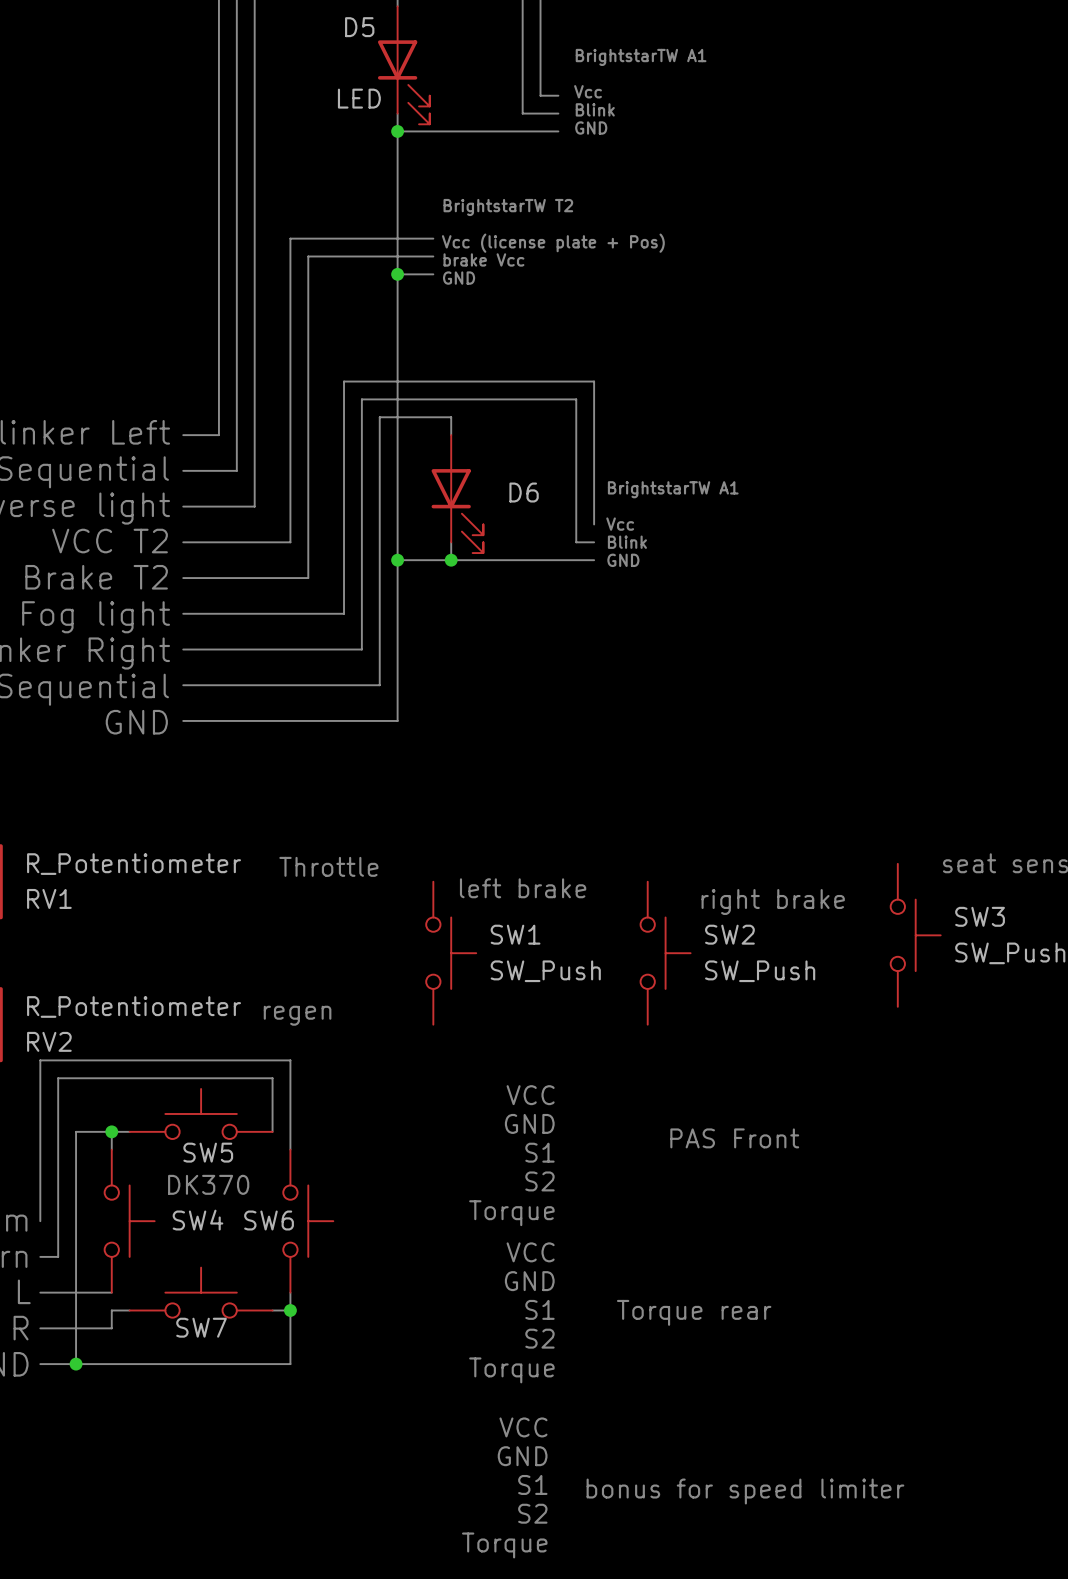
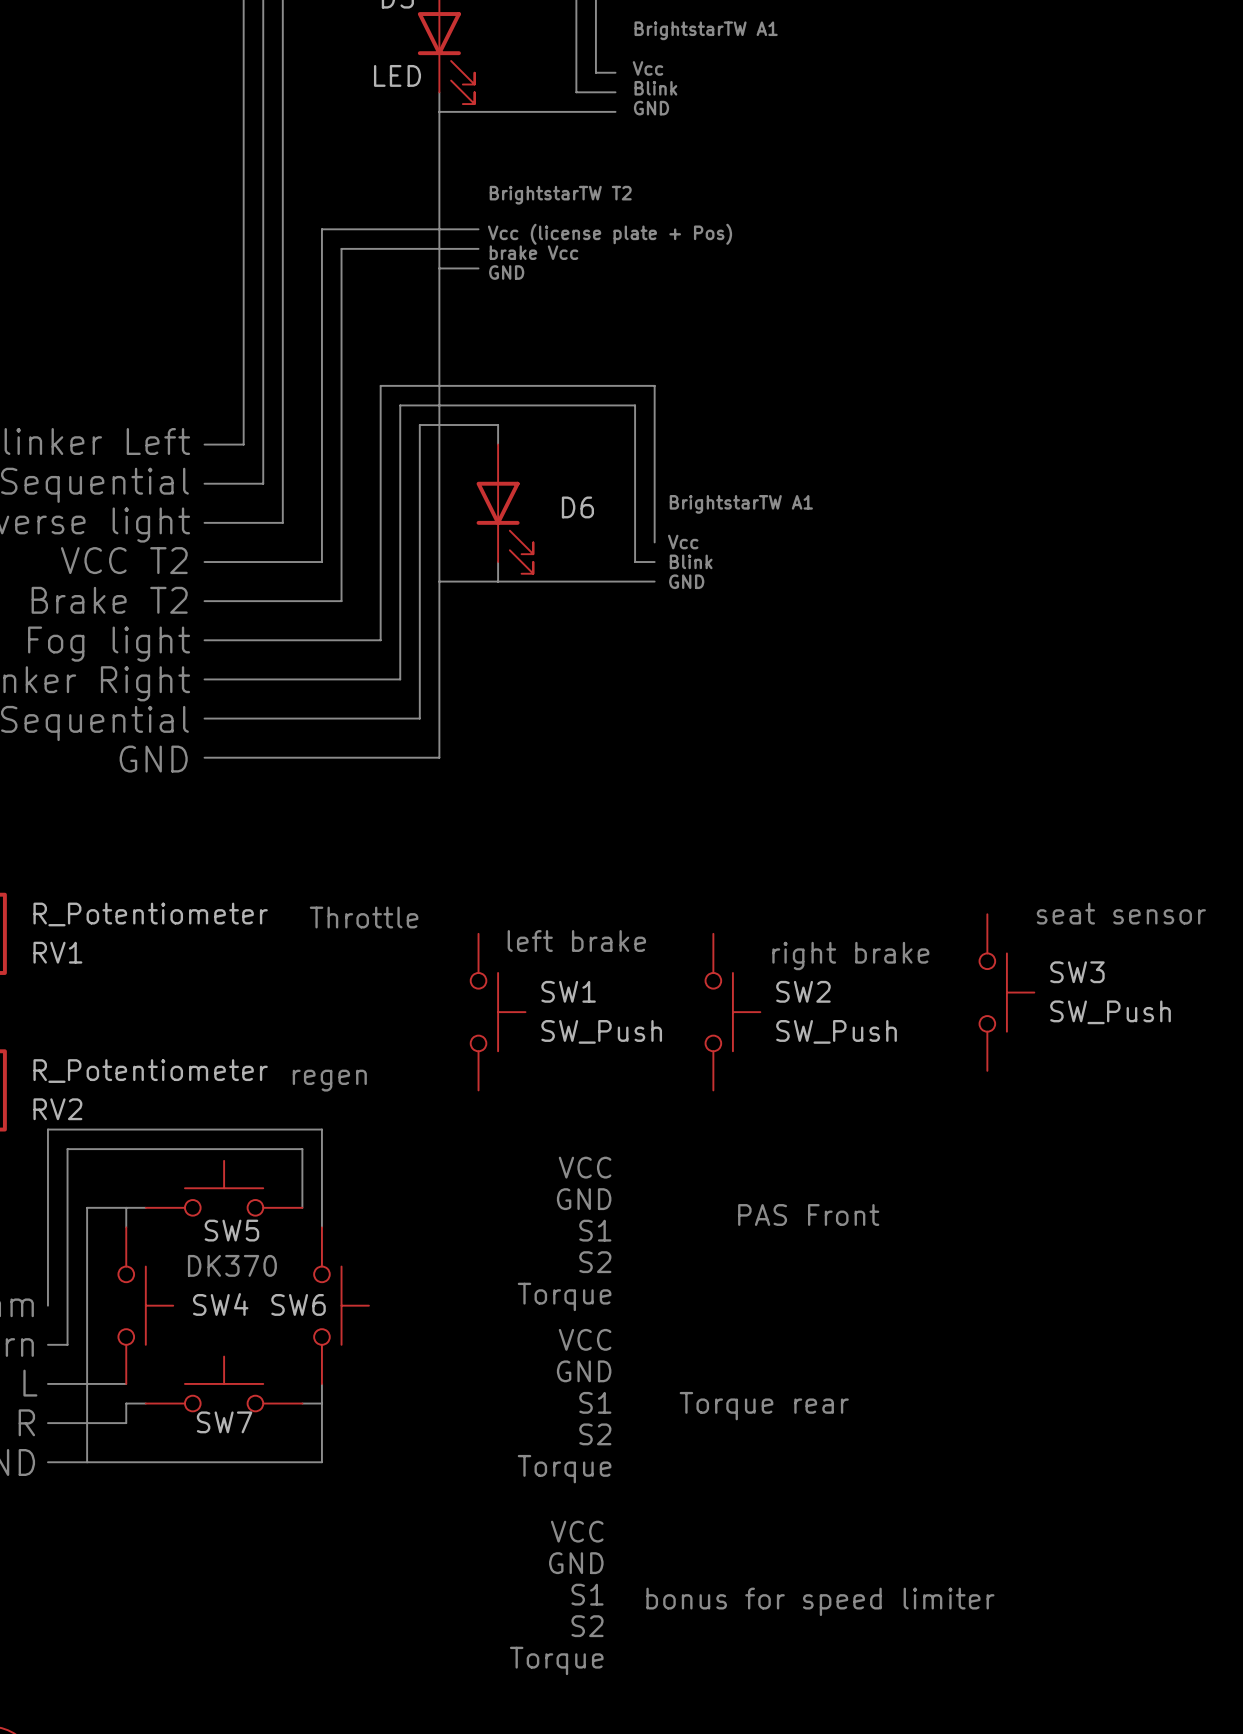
junction: (397, 131) -> none
junction: (397, 274) -> none
junction: (397, 560) -> none
junction: (451, 560) -> none
junction: (111, 1131) -> none
junction: (290, 1310) -> none
junction: (76, 1364) -> none

